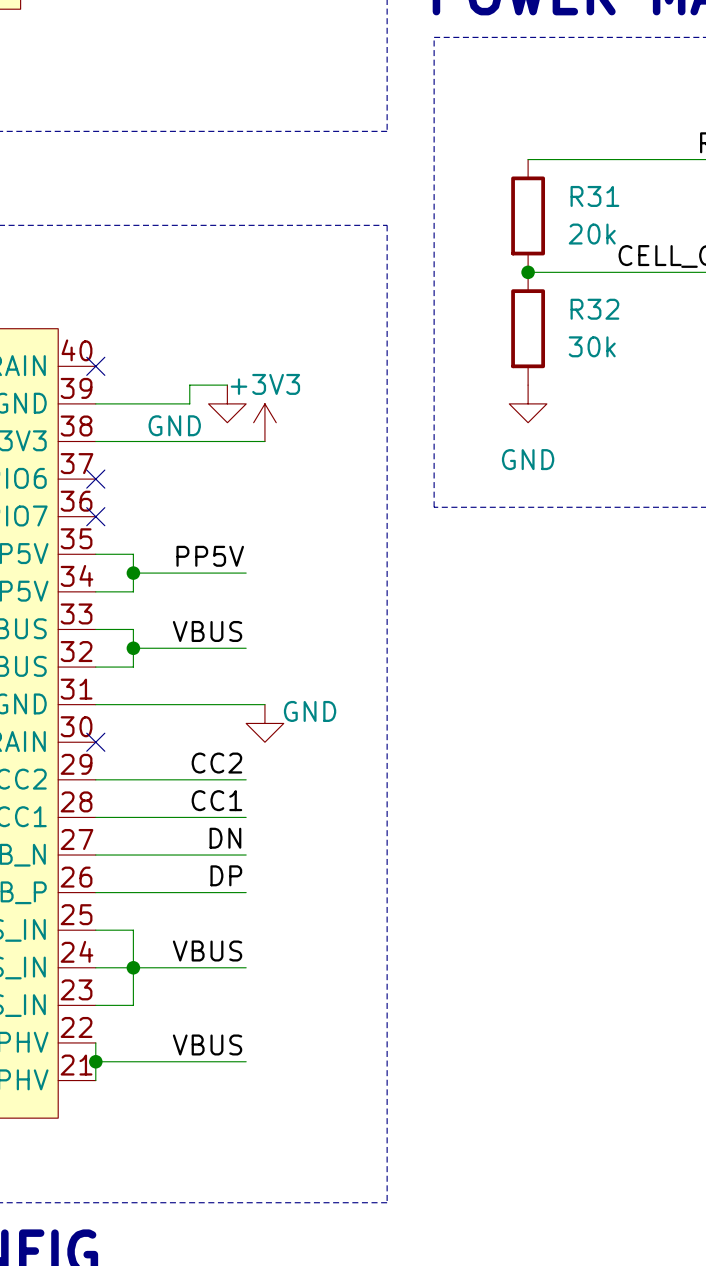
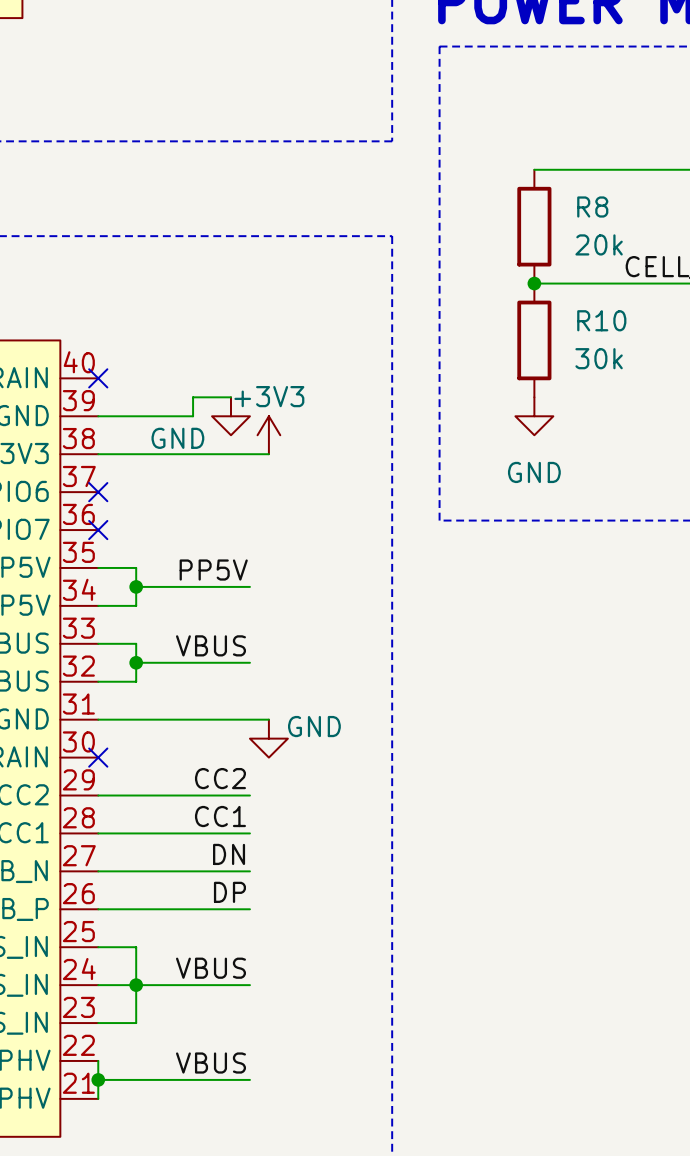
R31 name: R31 (594, 196) -> R8 (592, 206)
R32 name: R32 (594, 309) -> R10 (601, 320)

